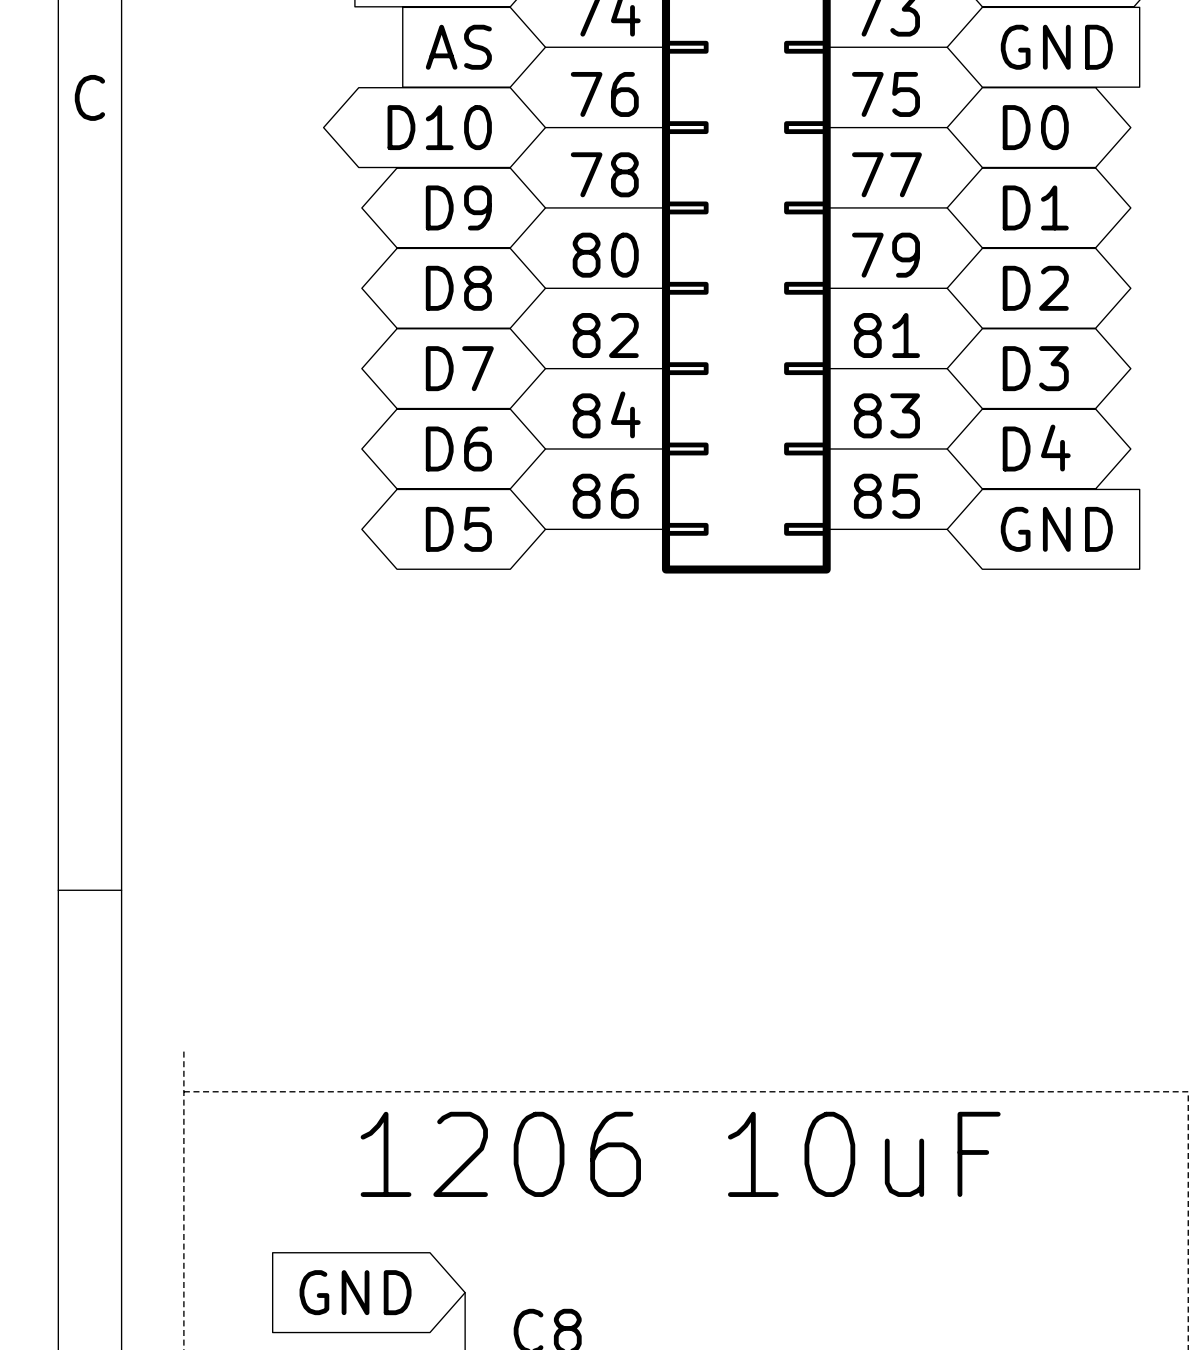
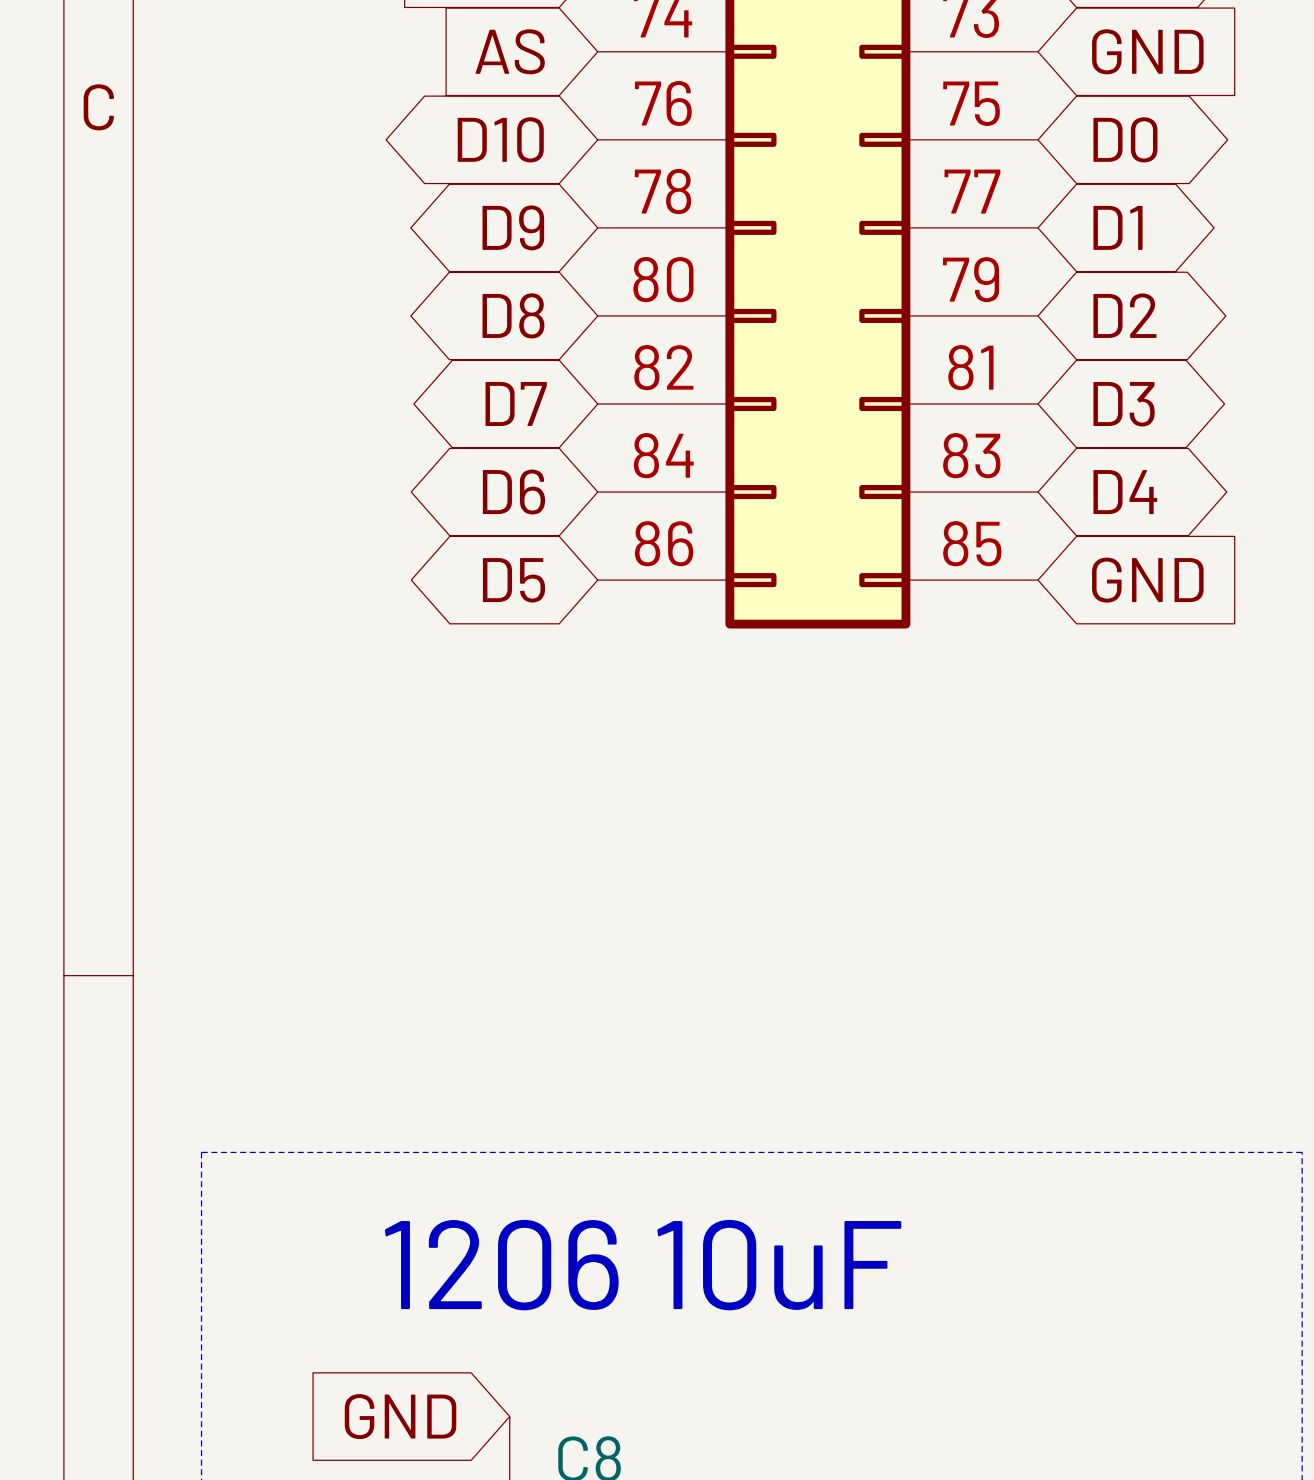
line: (183, 1091) (1188, 1091) -> (201, 1152) (1302, 1152) (1302, 1196)

